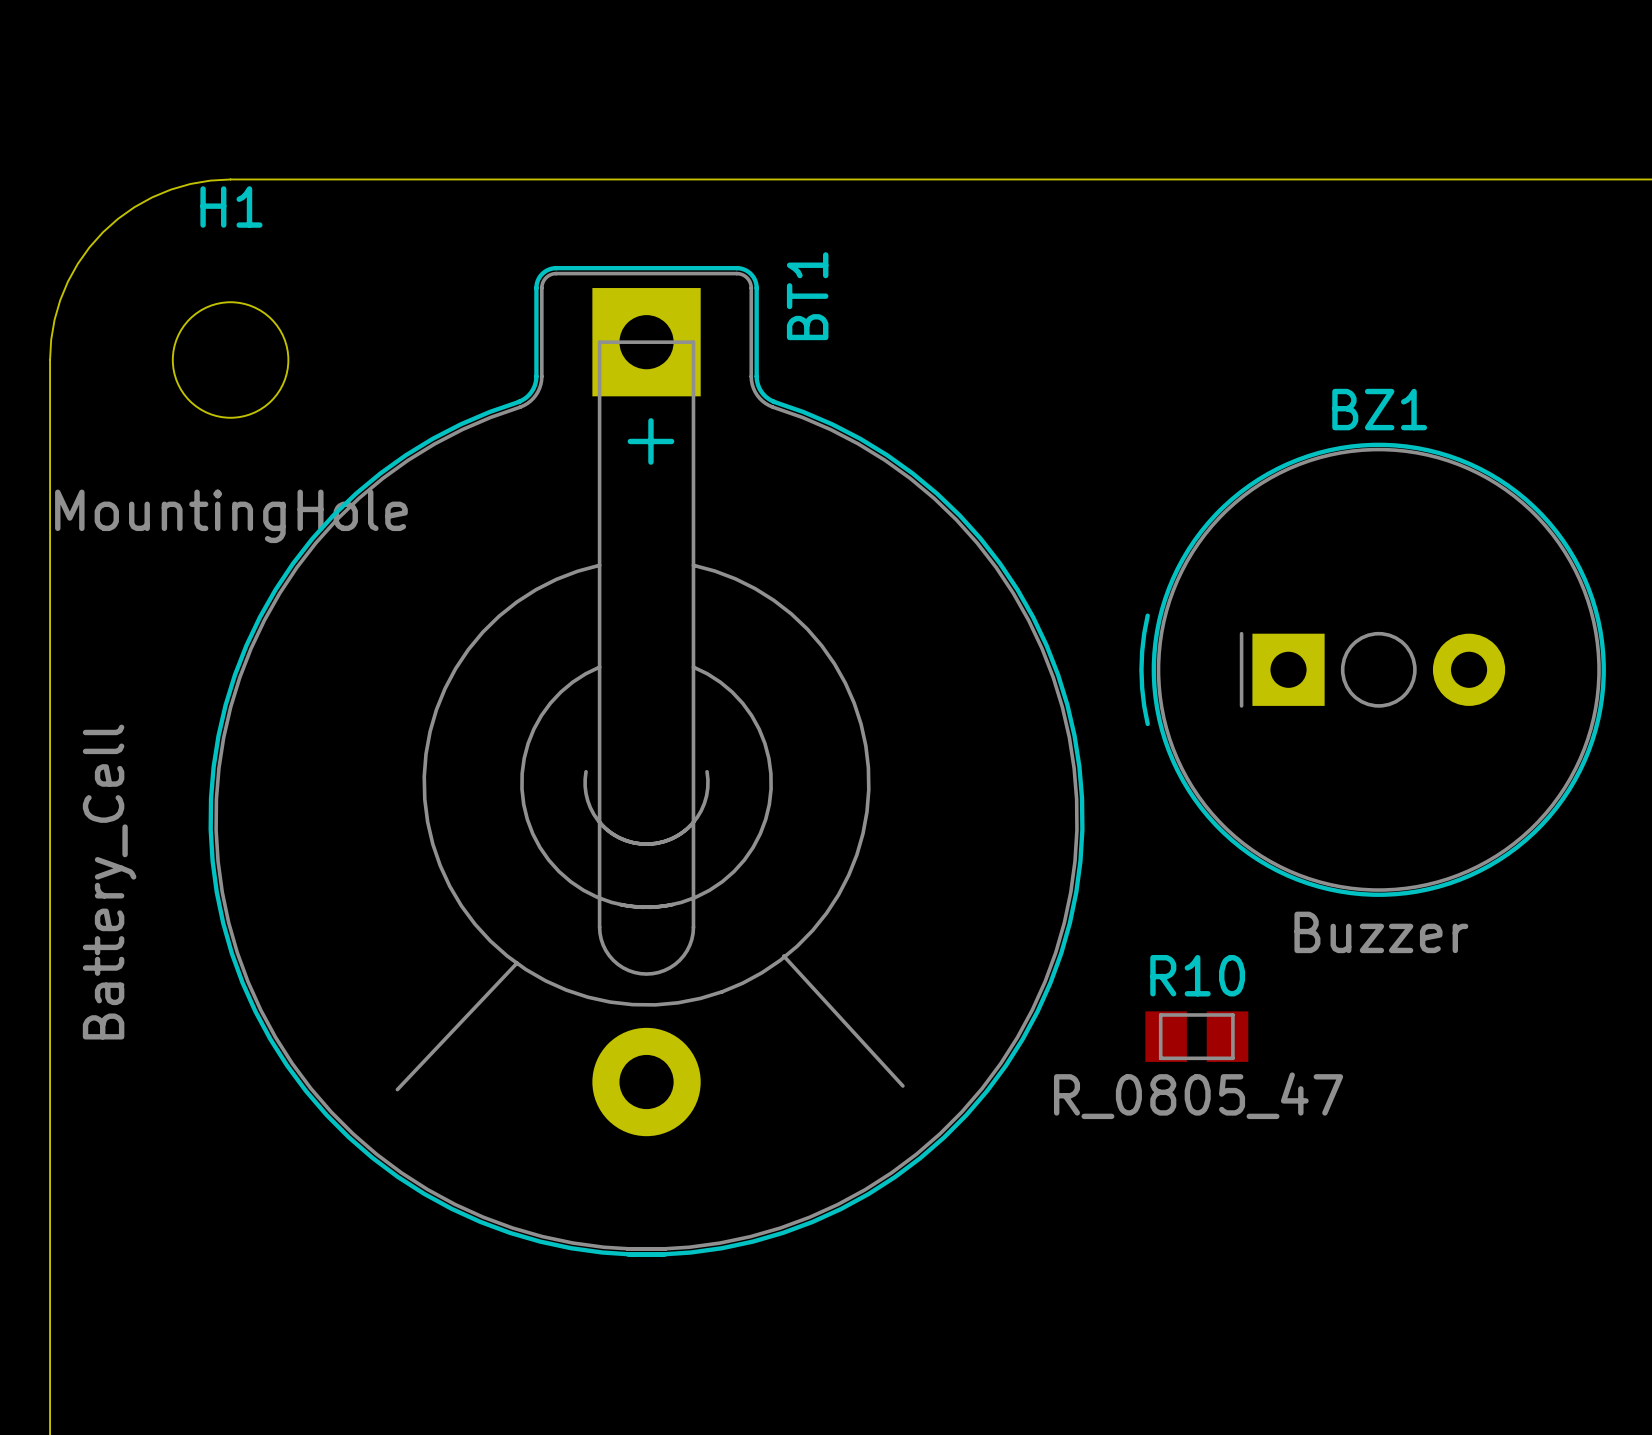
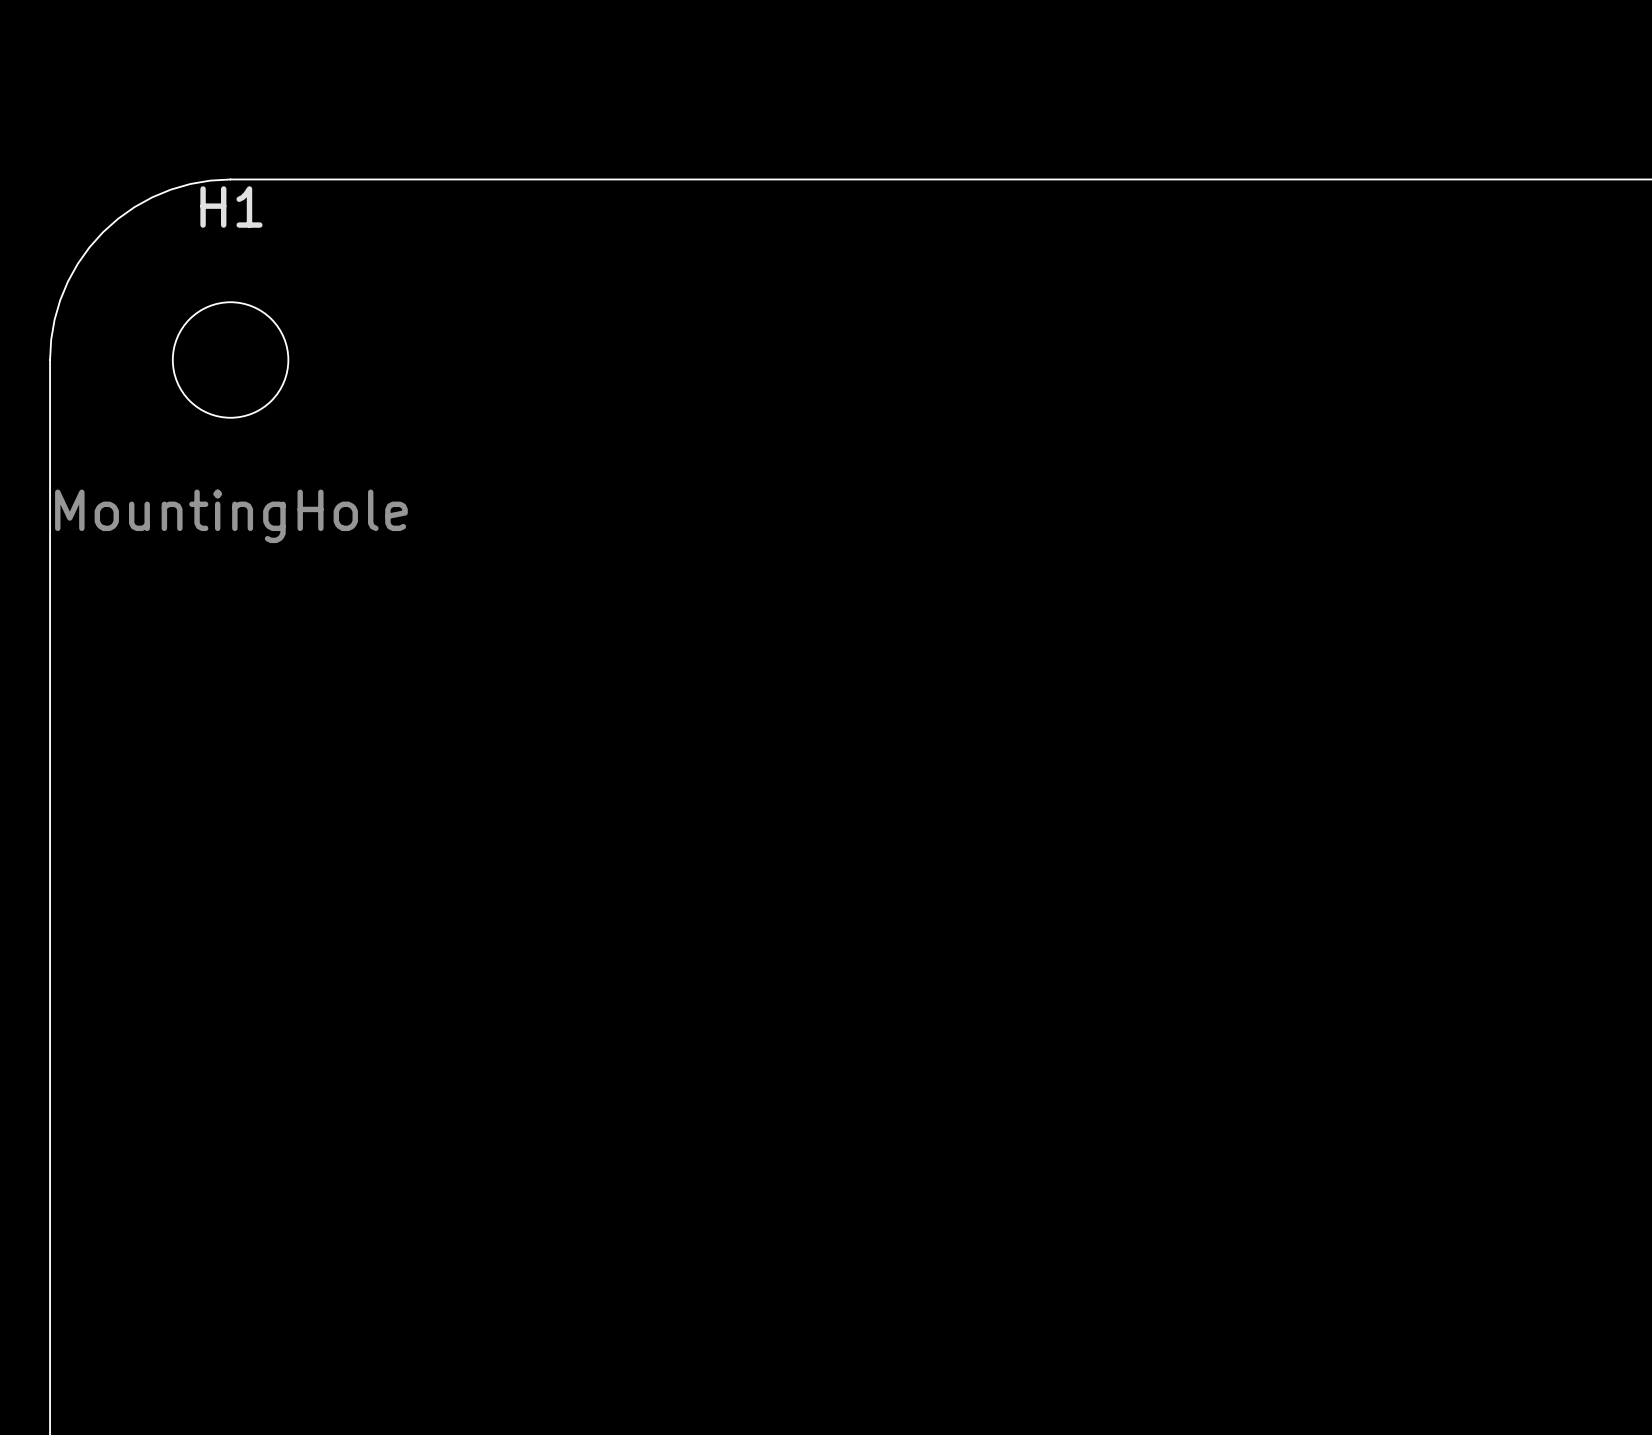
BZ1: Buzzer (1372, 669) -> none
BT1: Battery_Cell (646, 761) -> none
R10: R_0805_47 (1196, 1036) -> none

